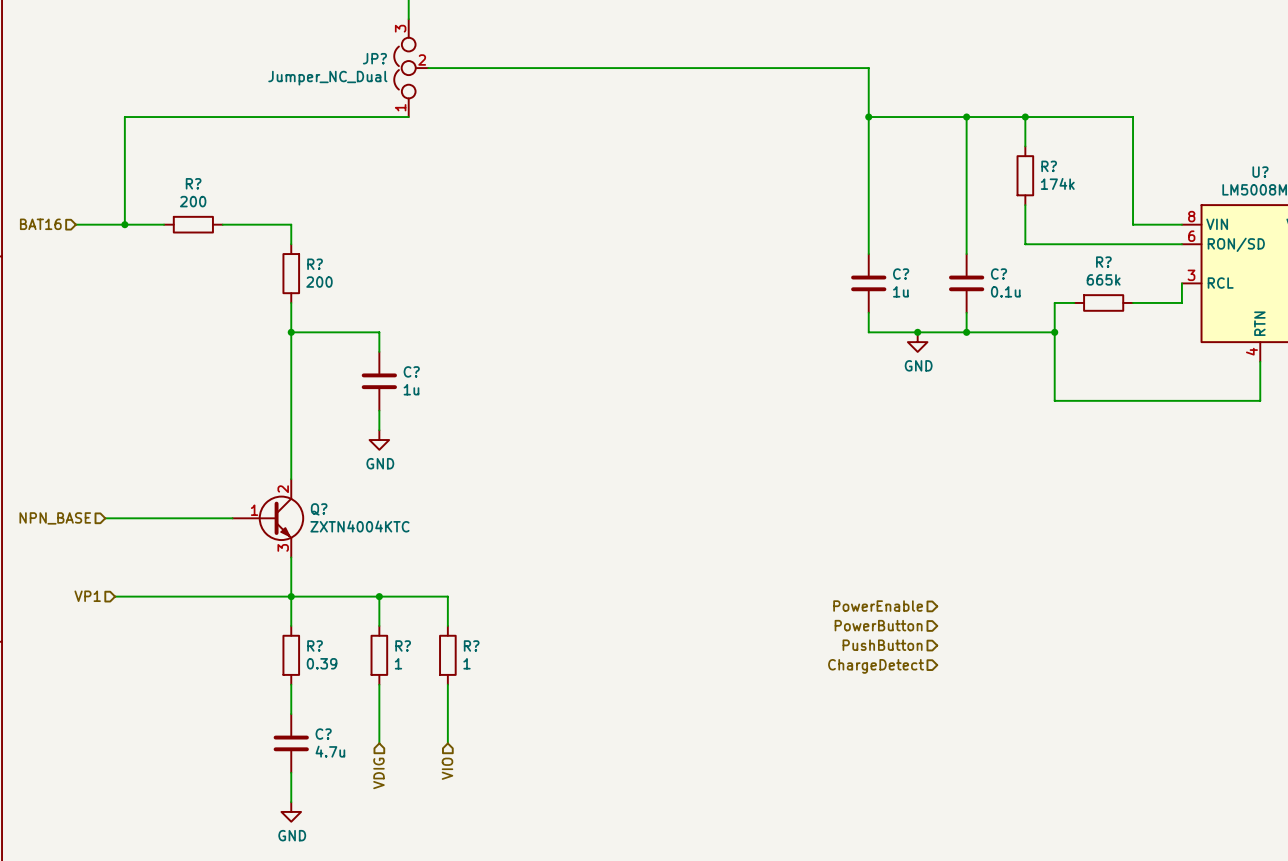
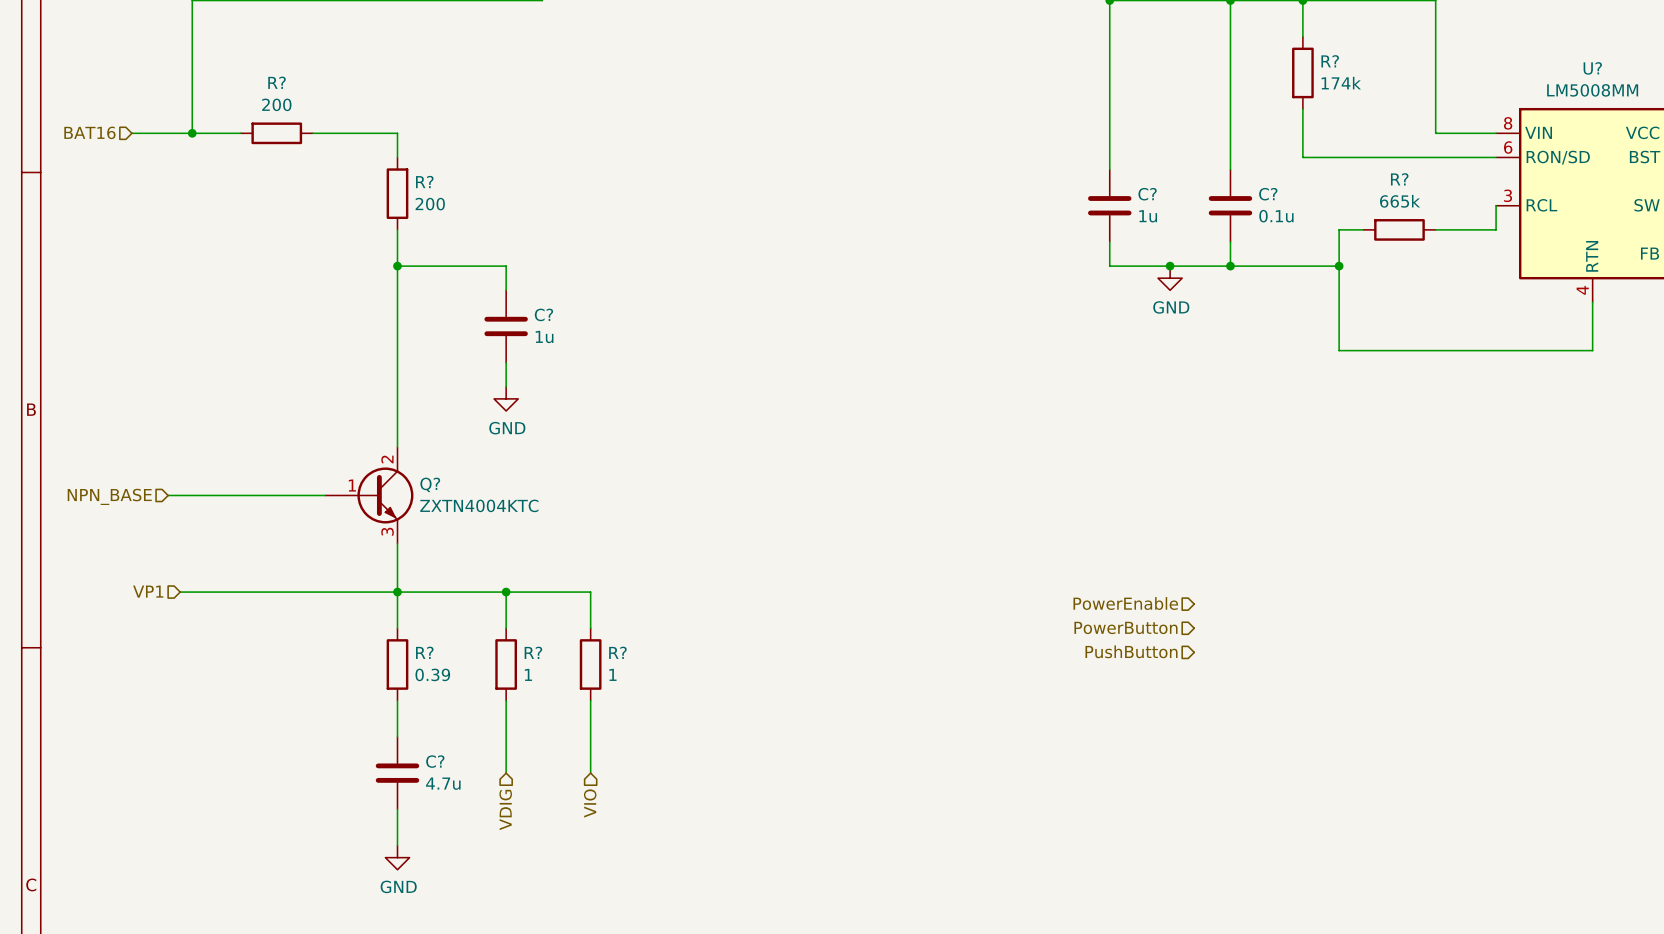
hierarchical label: ChargeDetect (876, 666) -> none

